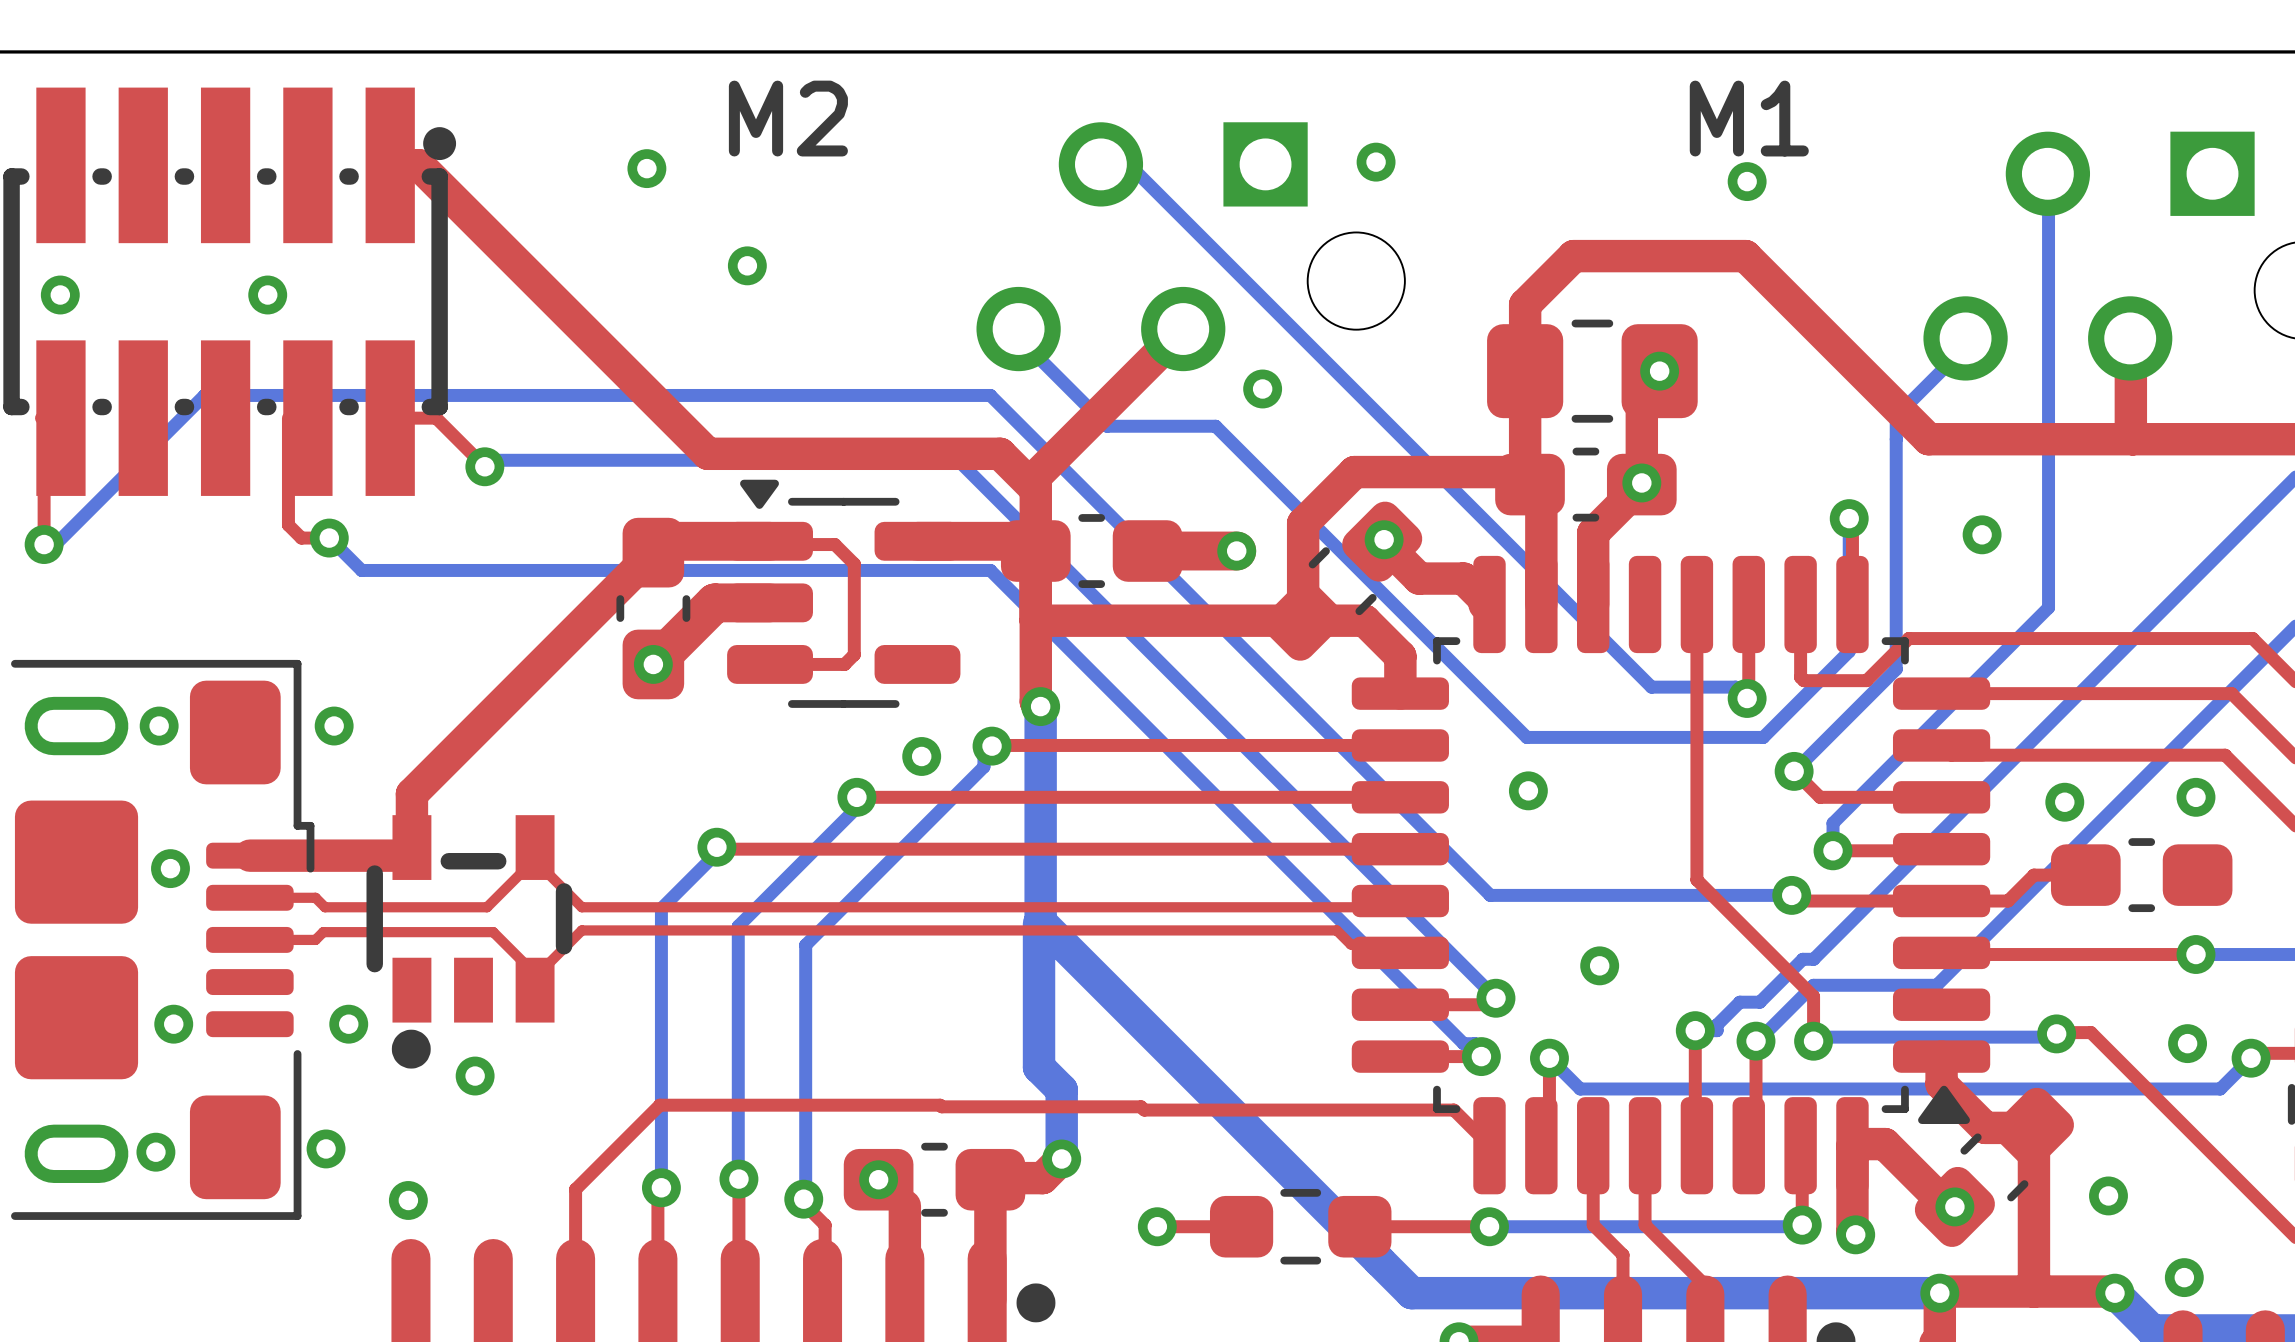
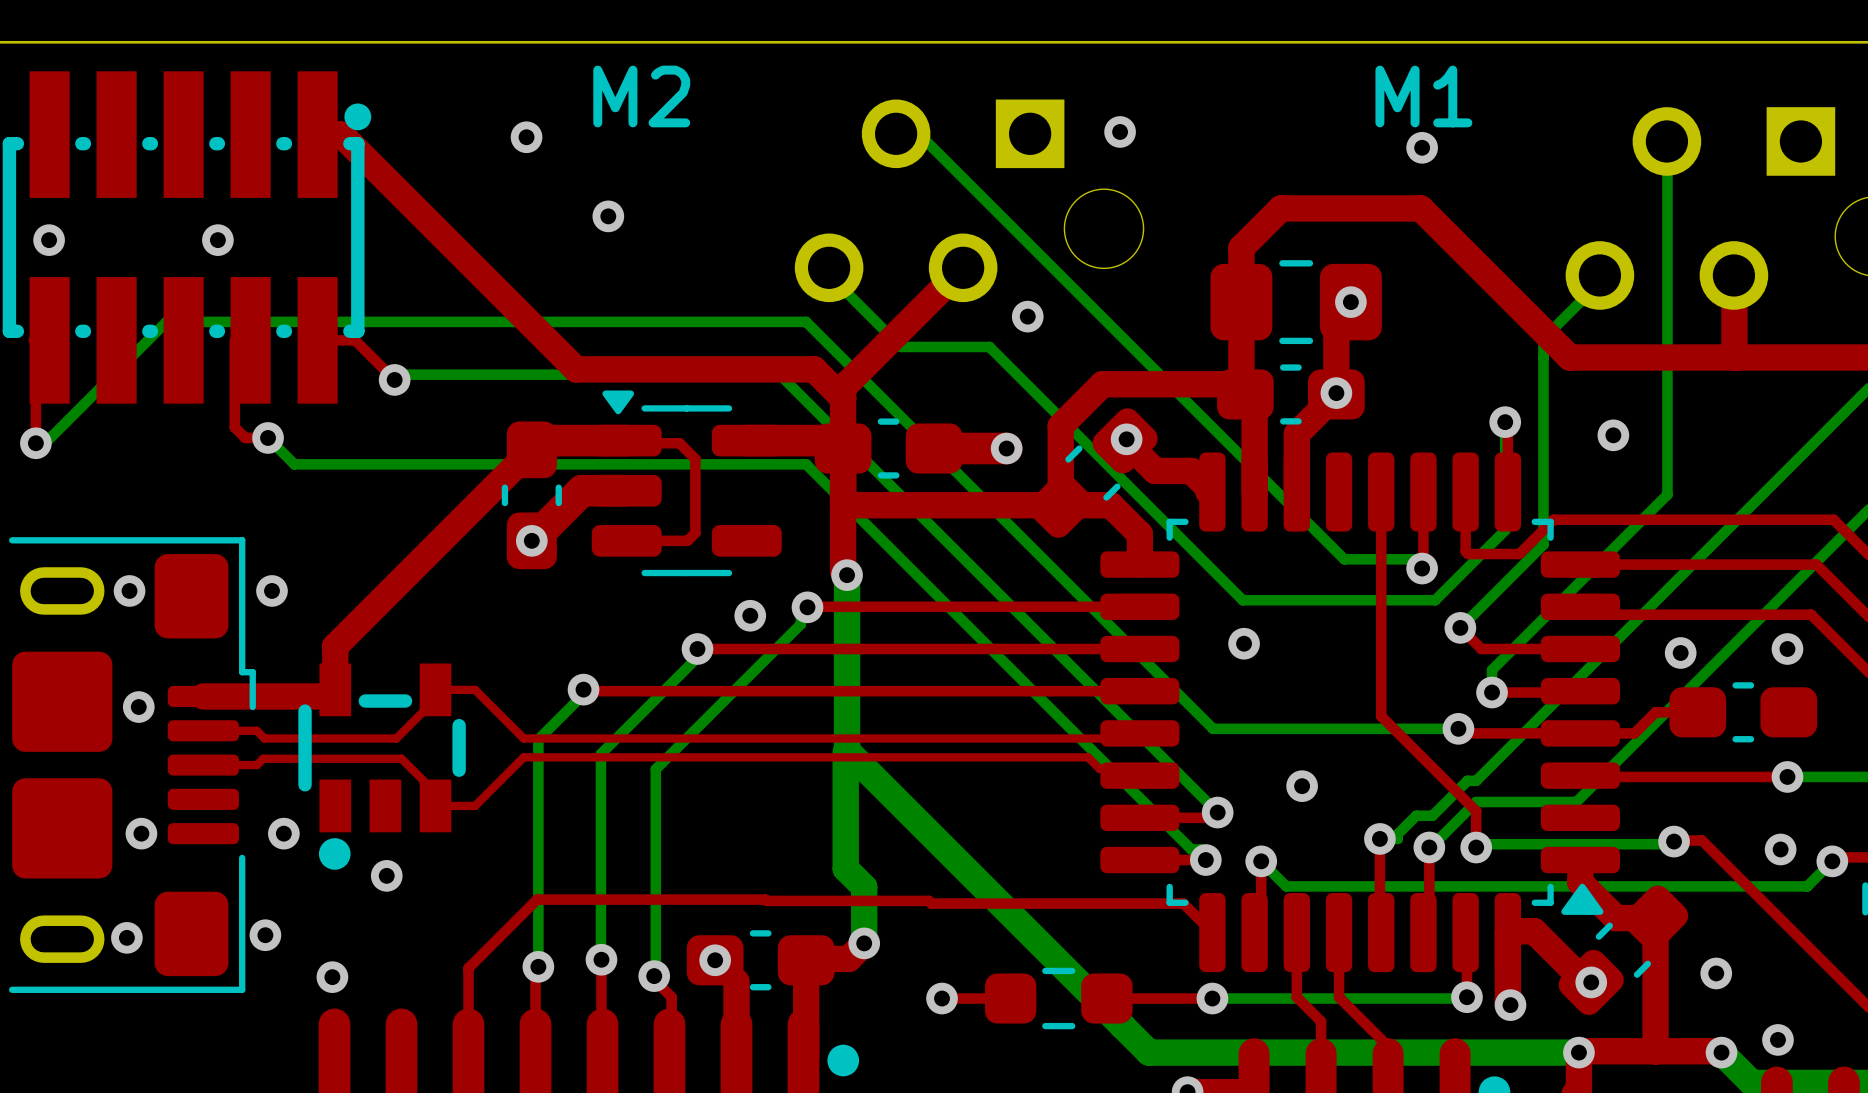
top track: (535, 860) (581, 907) (643, 907) -> (435, 689) (475, 689) (523, 738)
top track: (643, 930) (581, 930) (535, 977) -> (523, 757) (475, 805) (435, 805)

